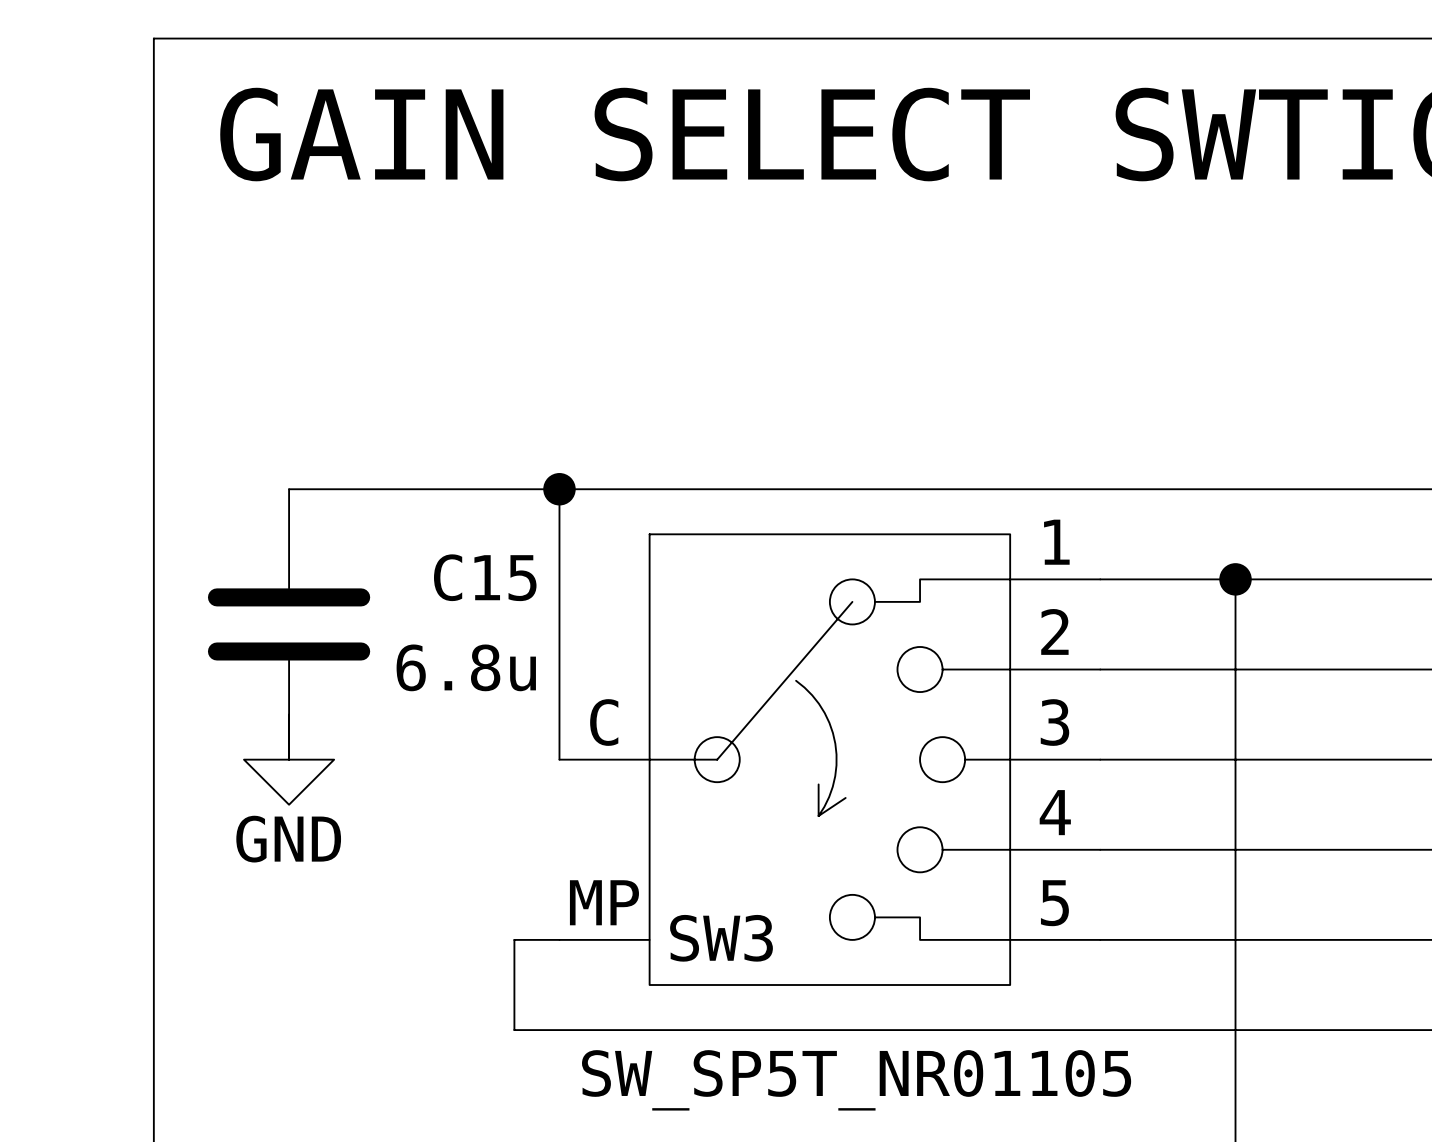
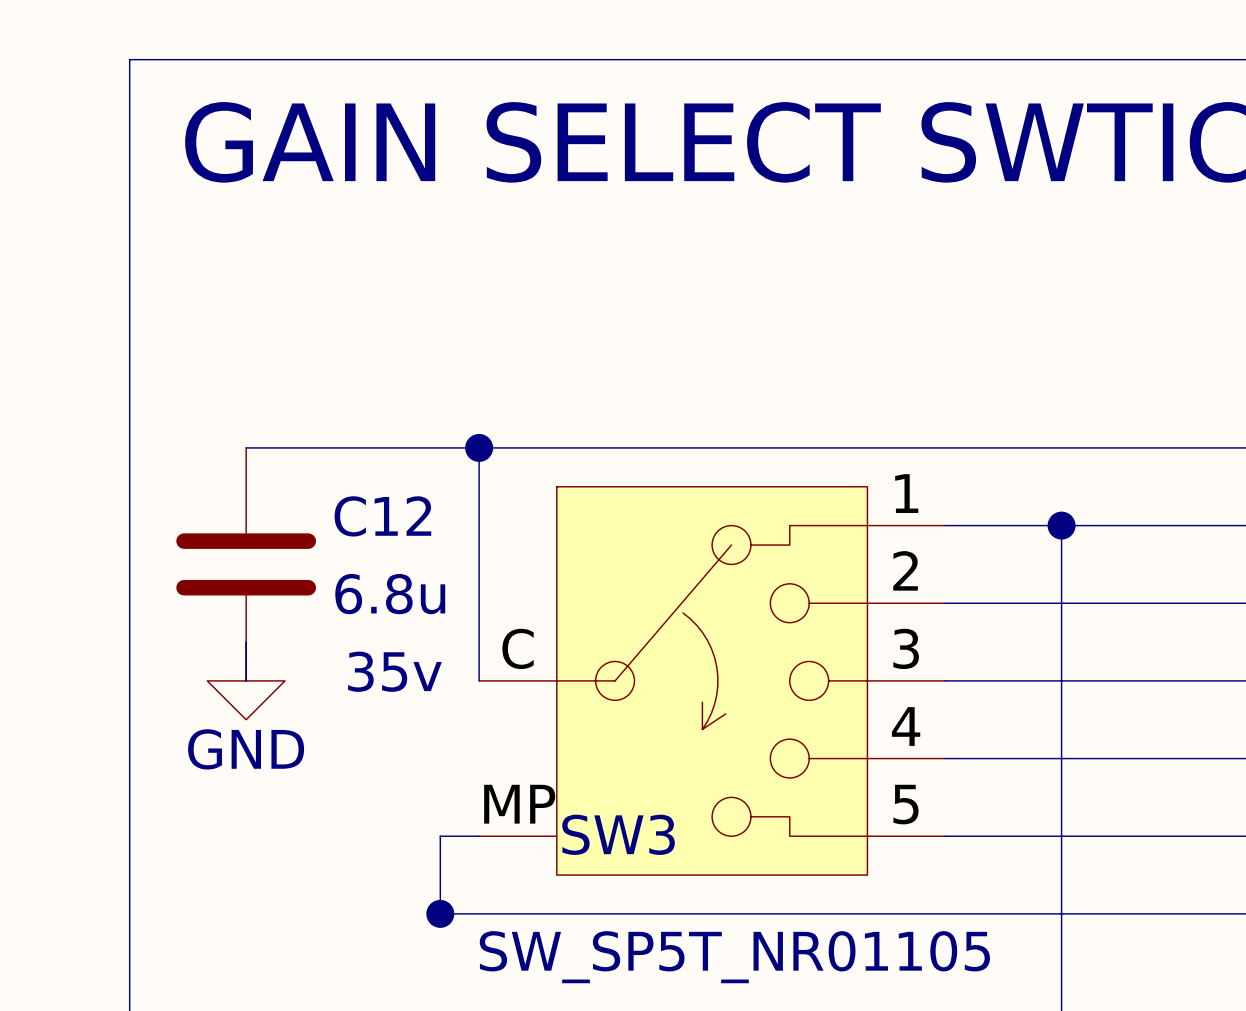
C15 name: C15 (485, 577) -> C12 (382, 516)
C15 value position: 6.8u (466, 667) -> 6.8u (390, 594)
C15 text: none -> 35v (394, 671)
junction: none -> (440, 913)

